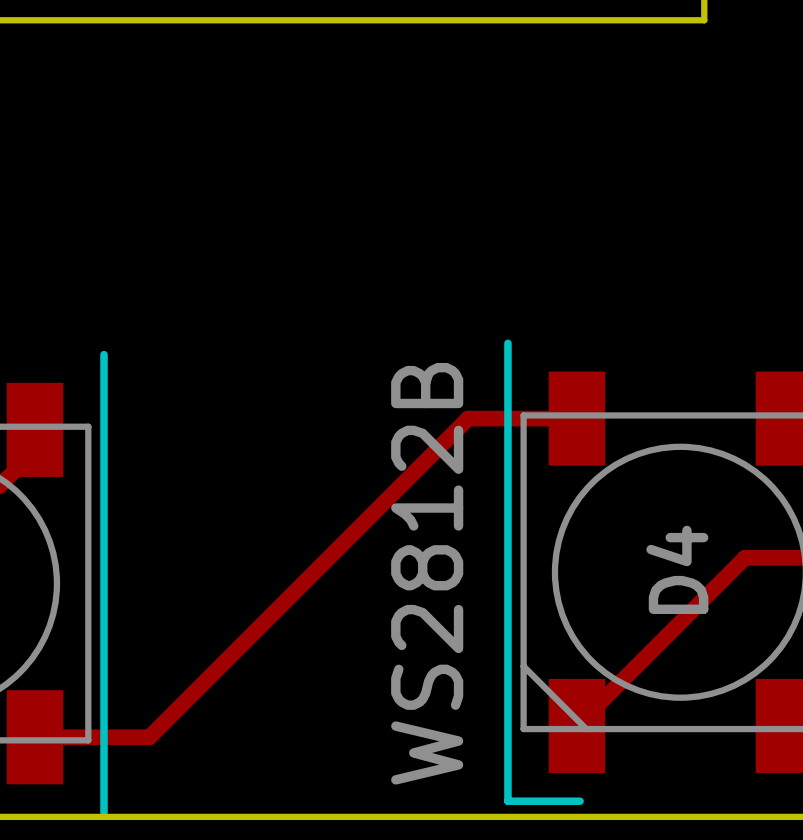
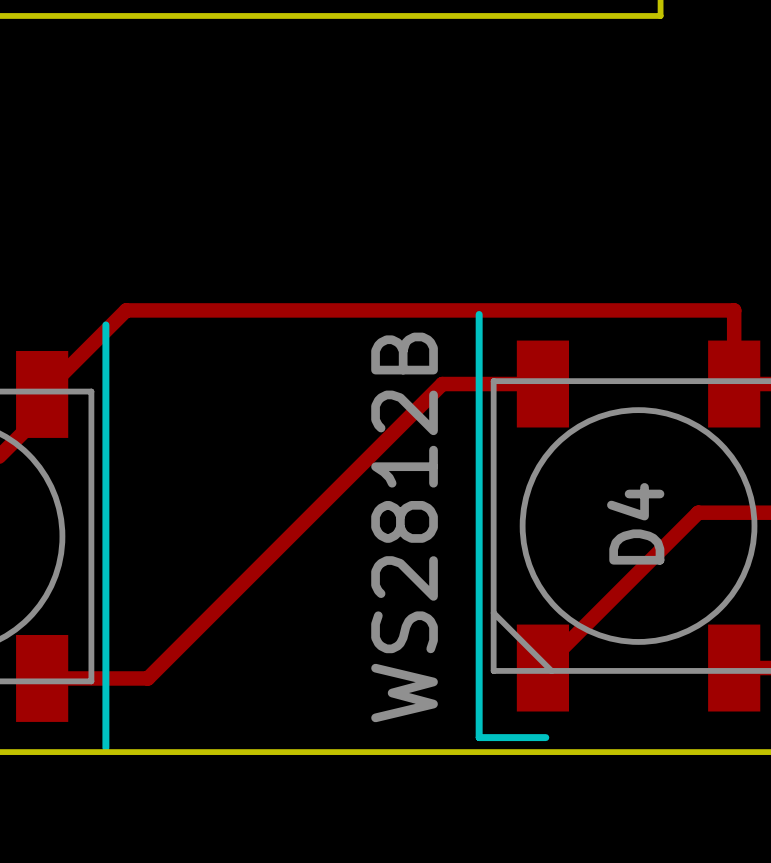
top track: none -> (53, 383) (126, 310) (734, 310) (734, 384)

